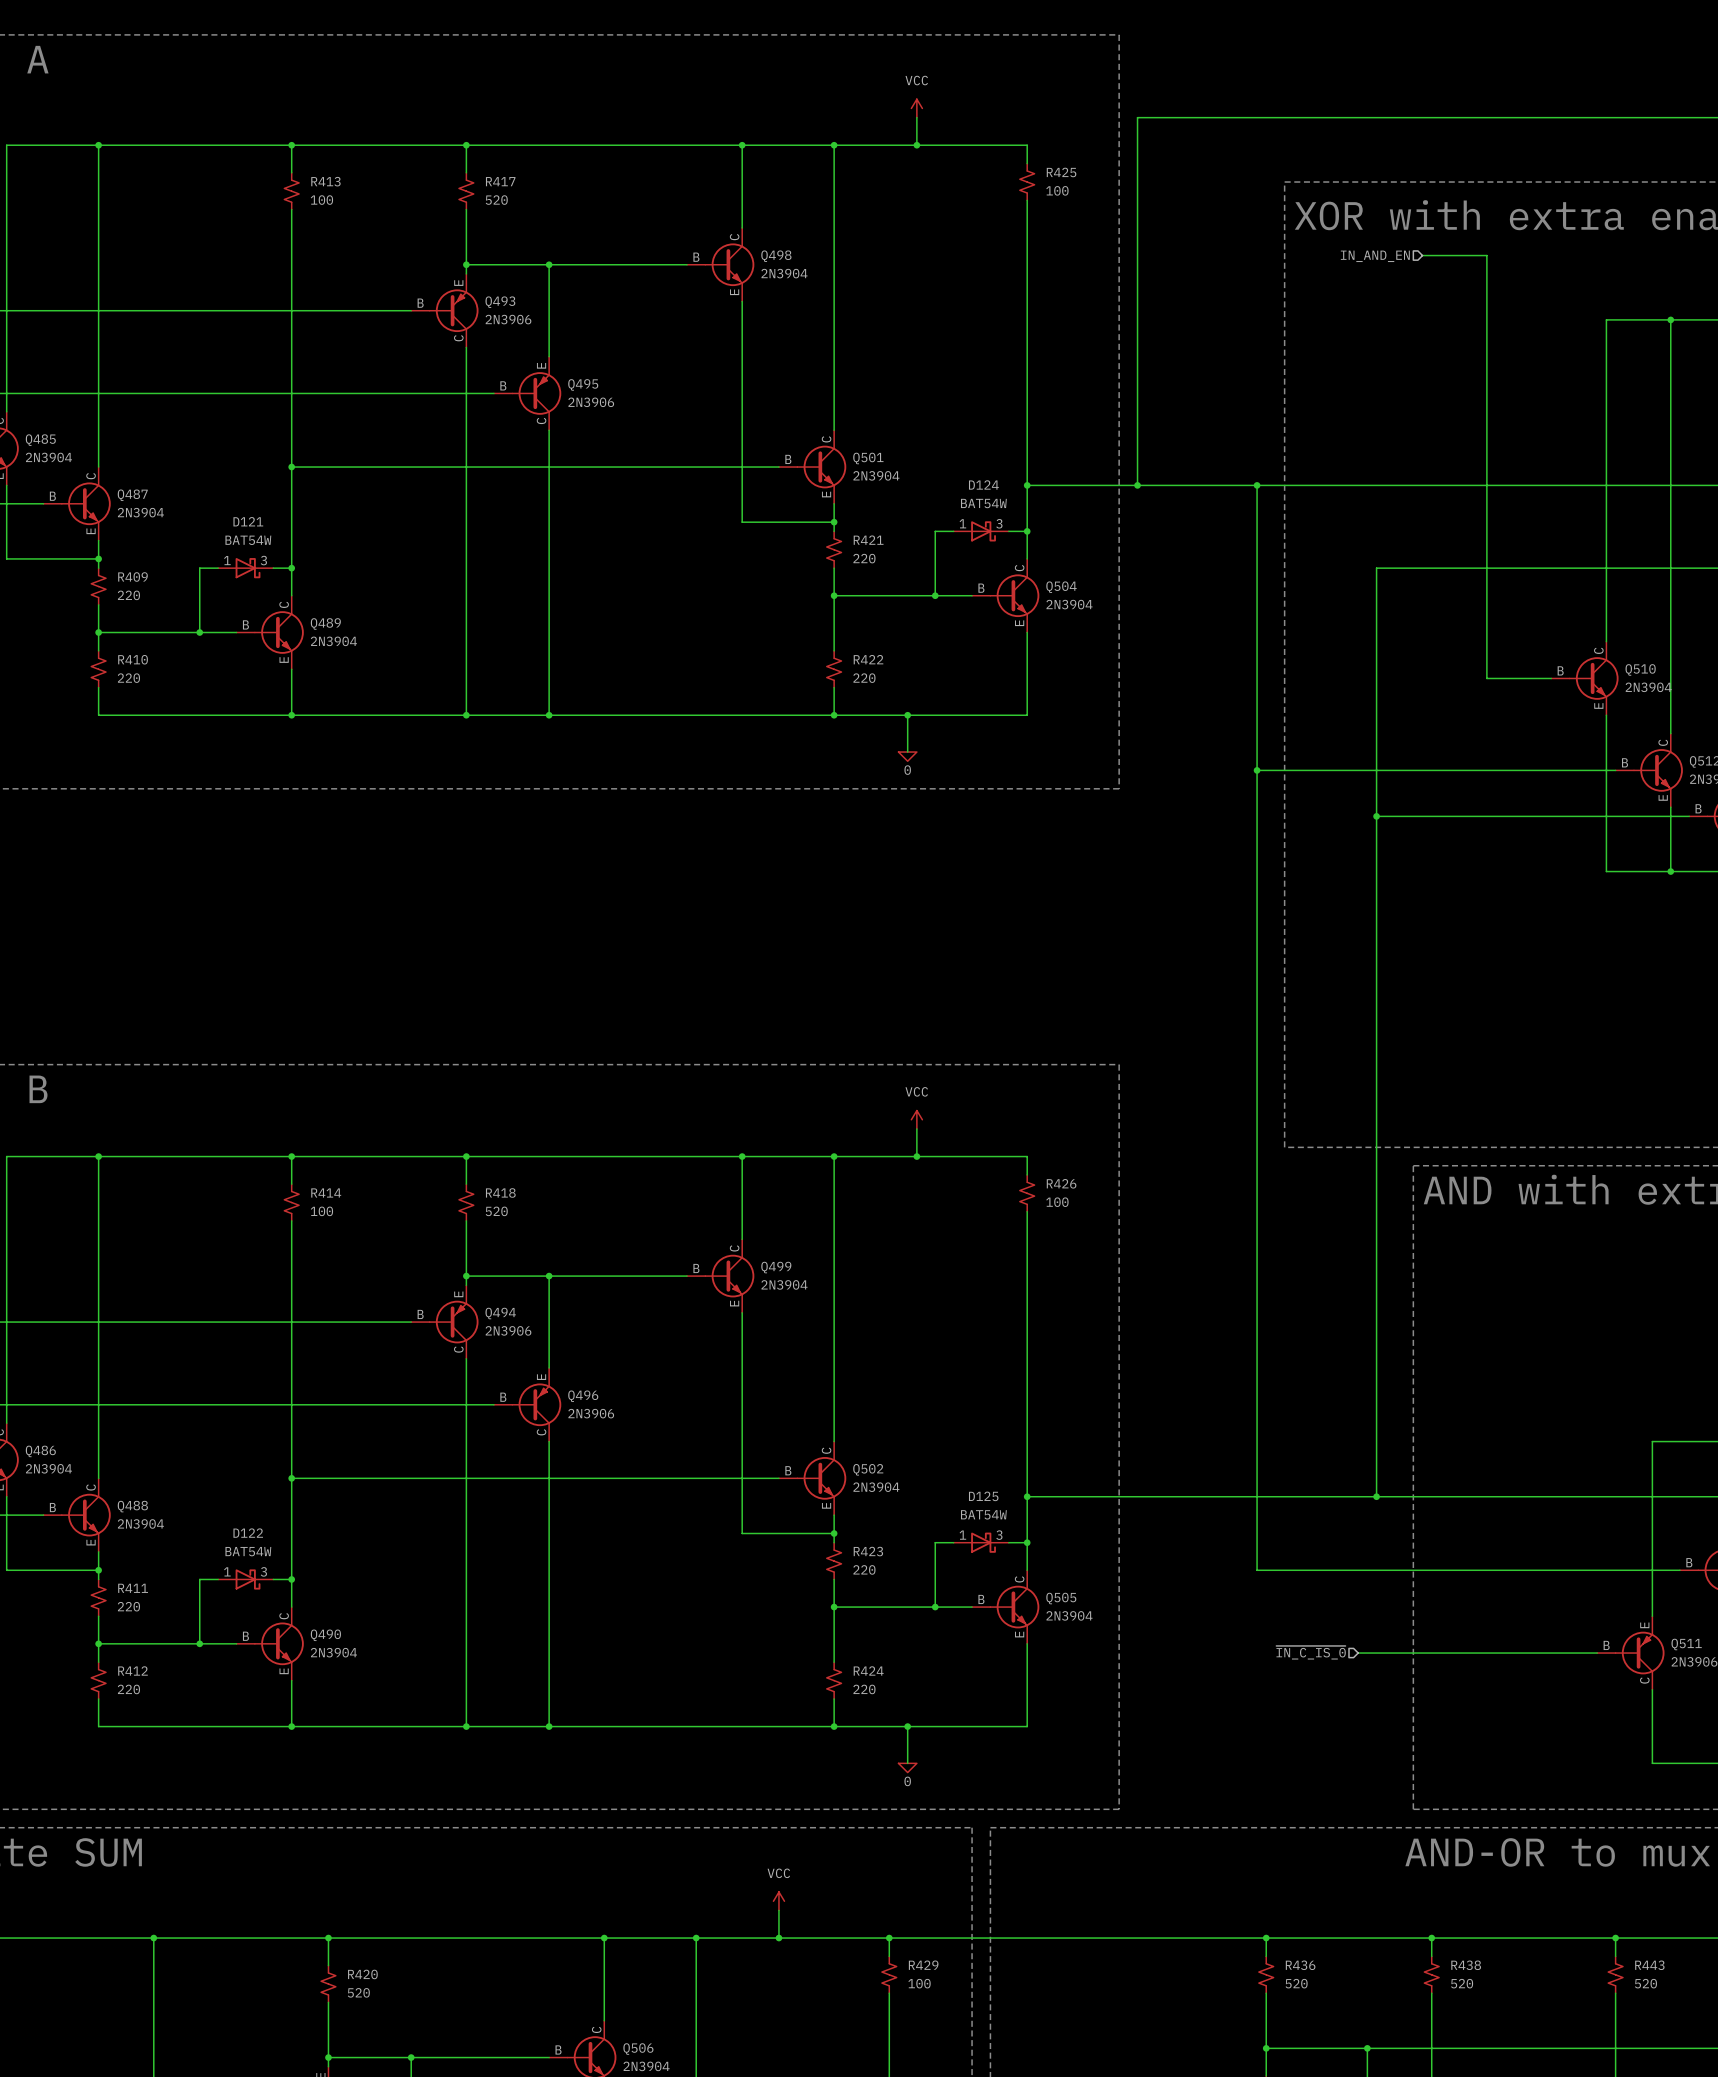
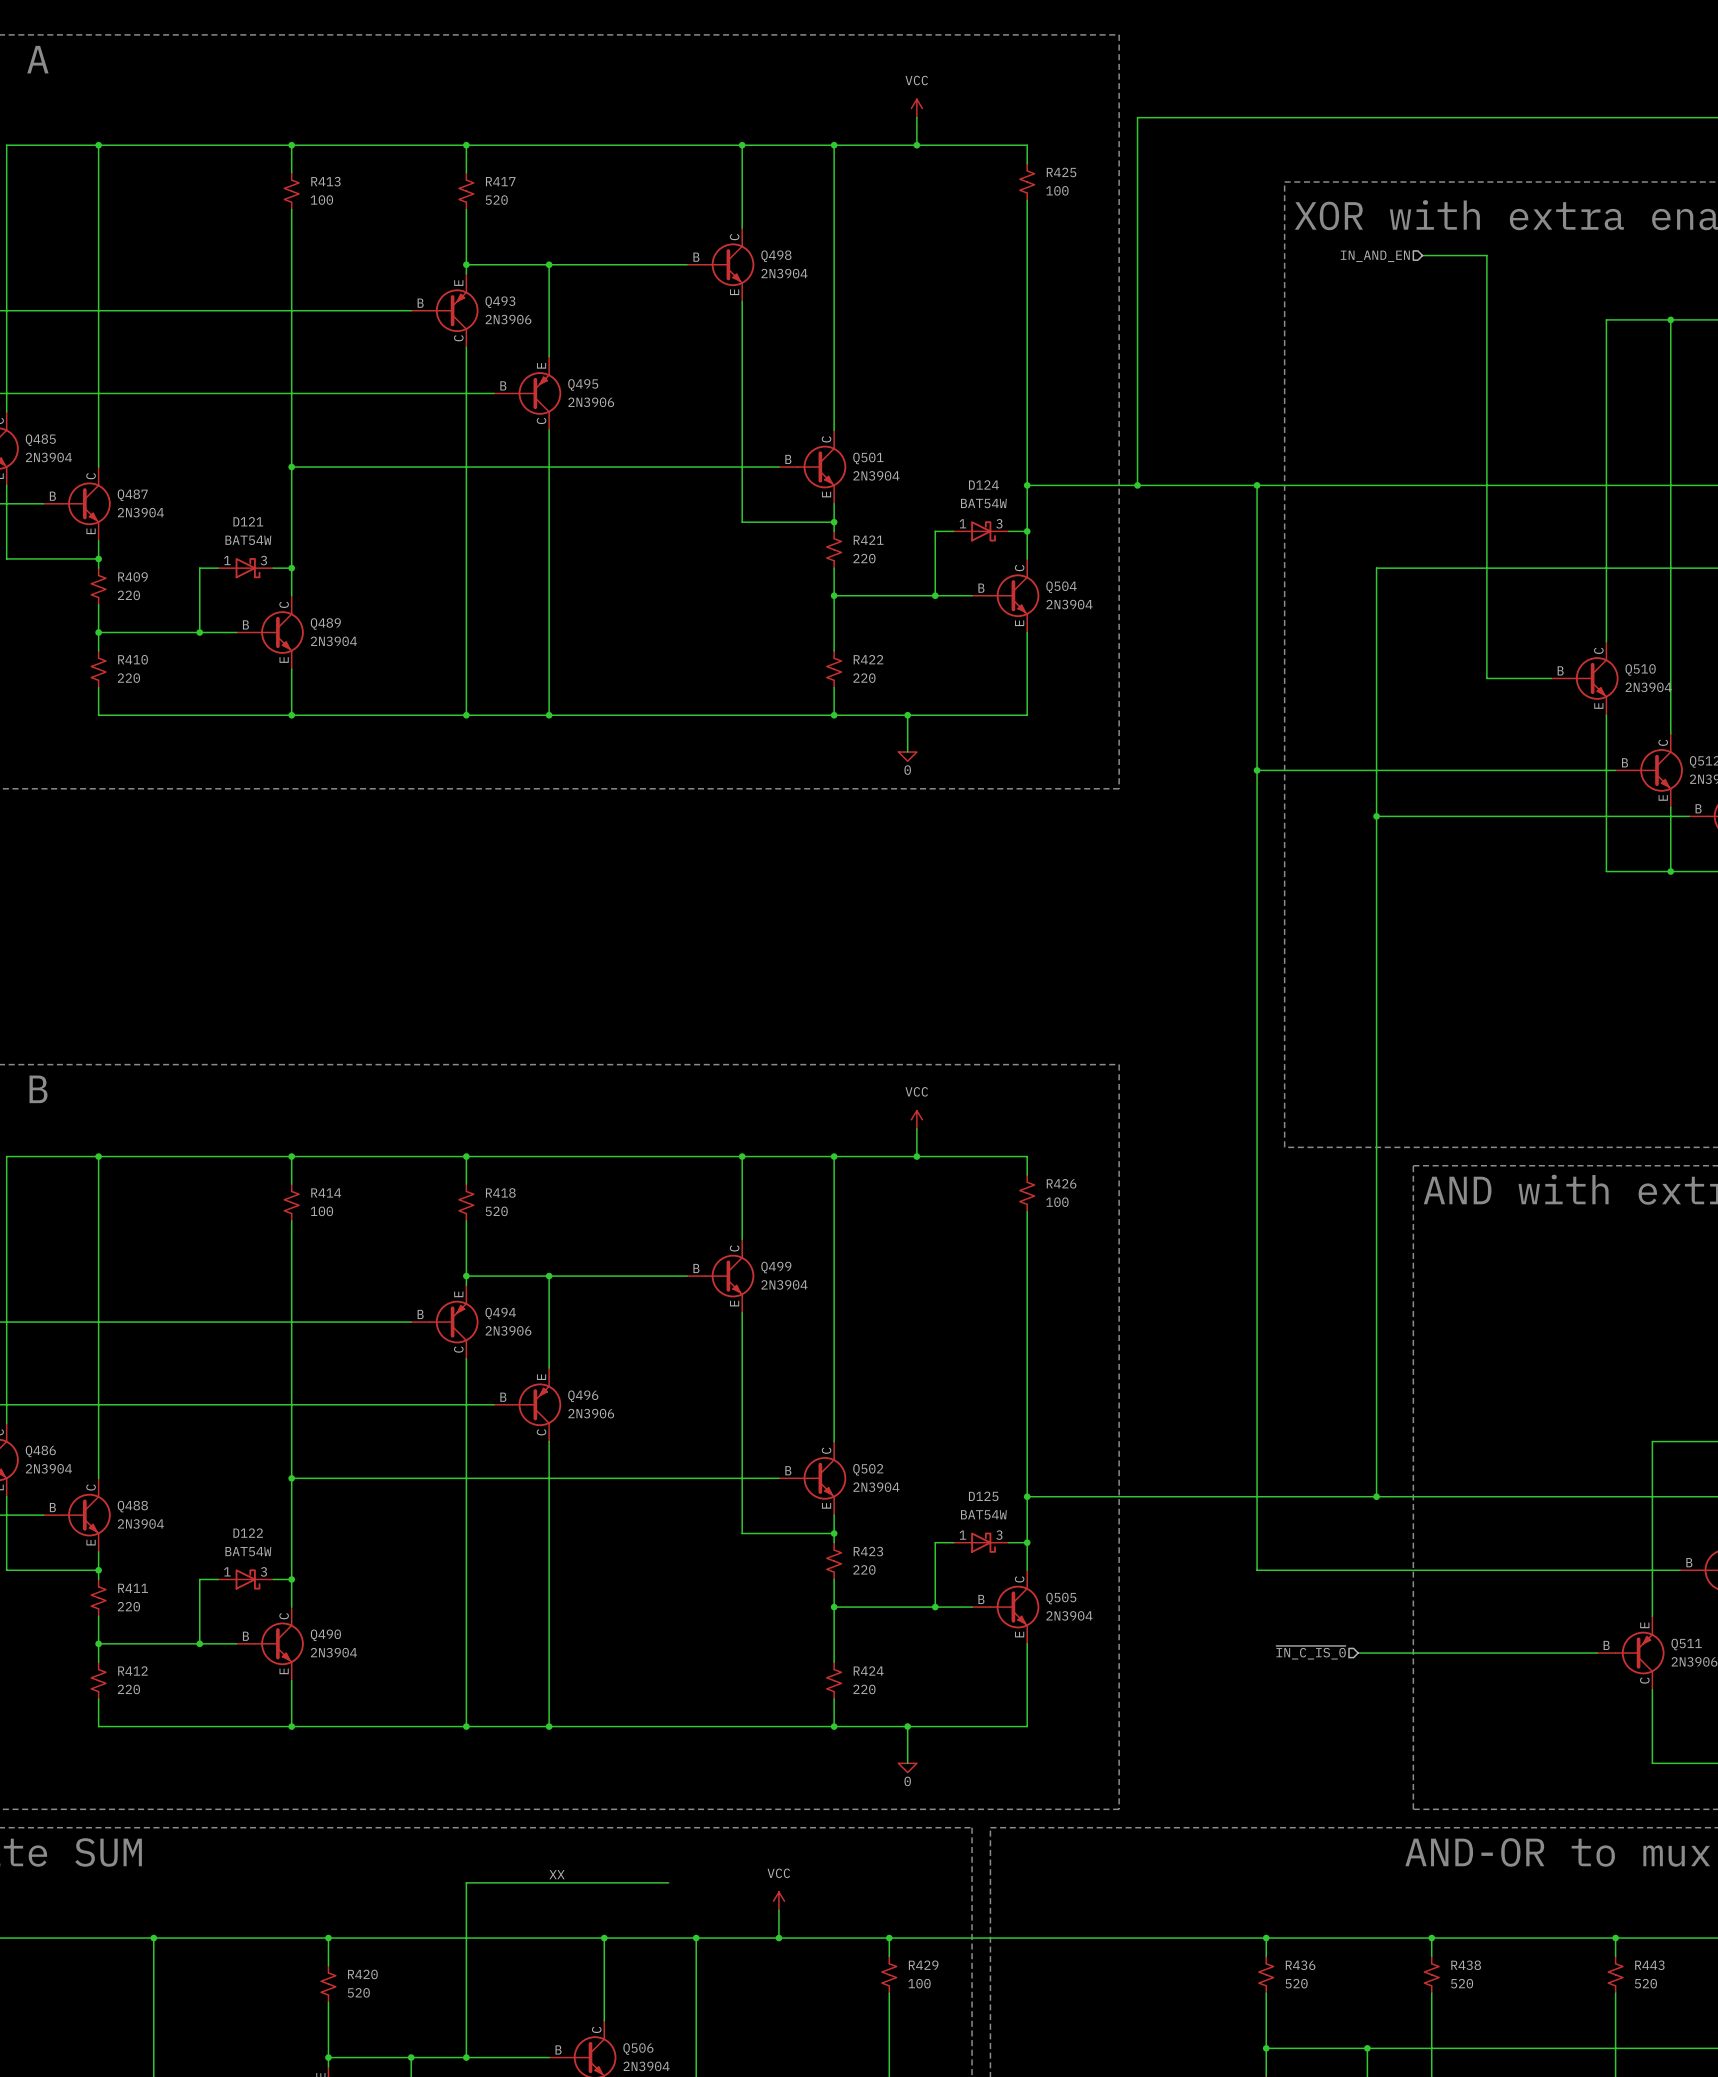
label: none -> XX (557, 1874)
wire: none -> (668, 1882) (466, 1882) (466, 2057)
junction: none -> (466, 2057)

